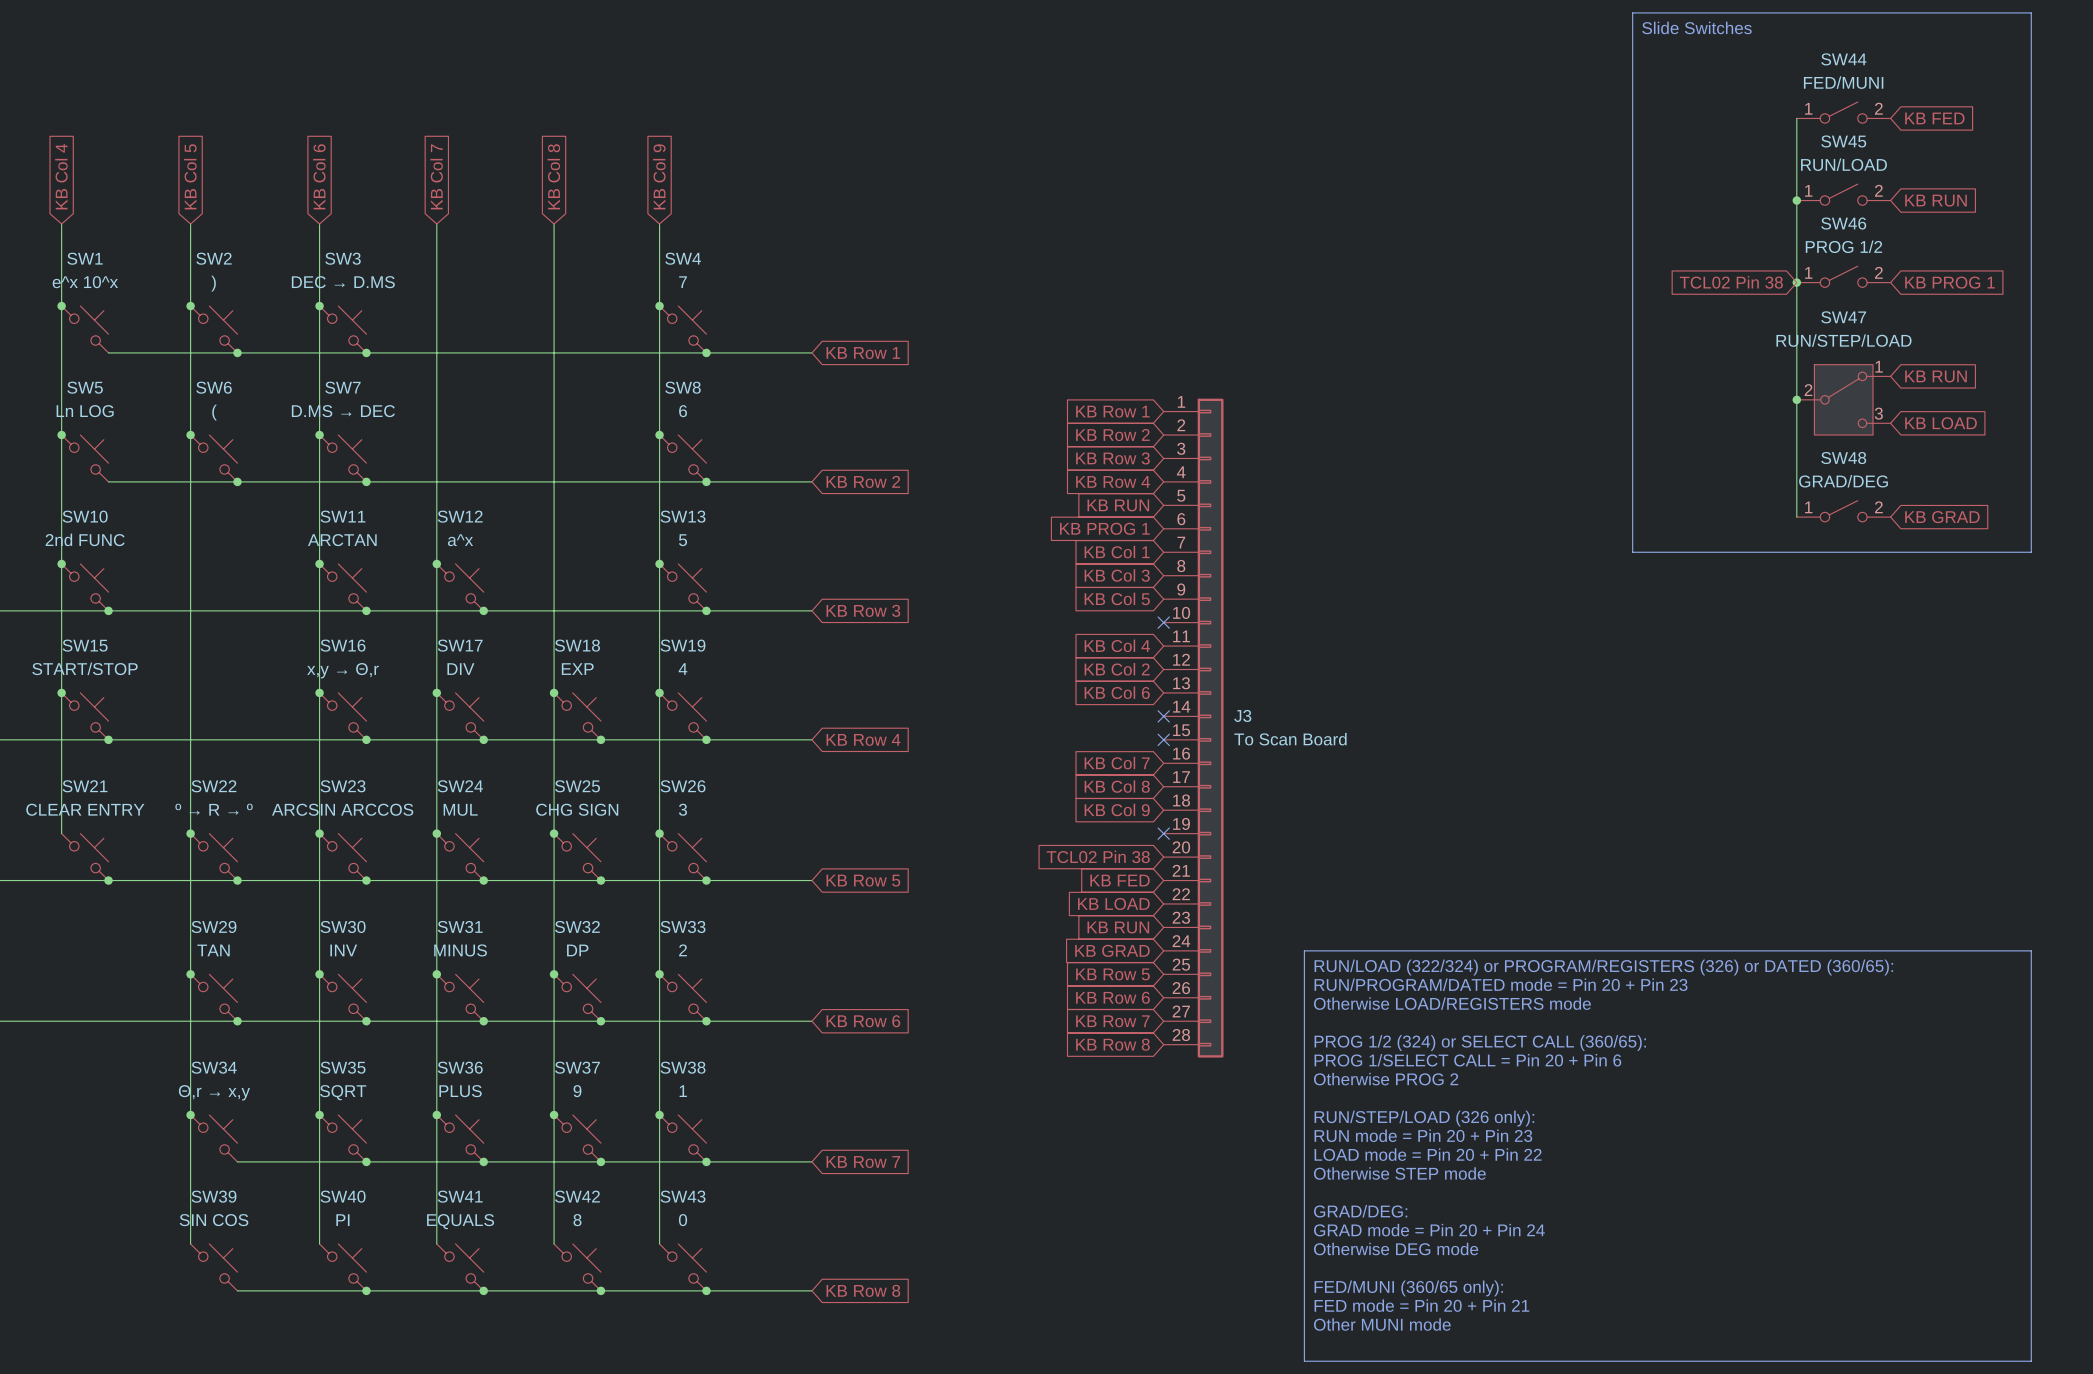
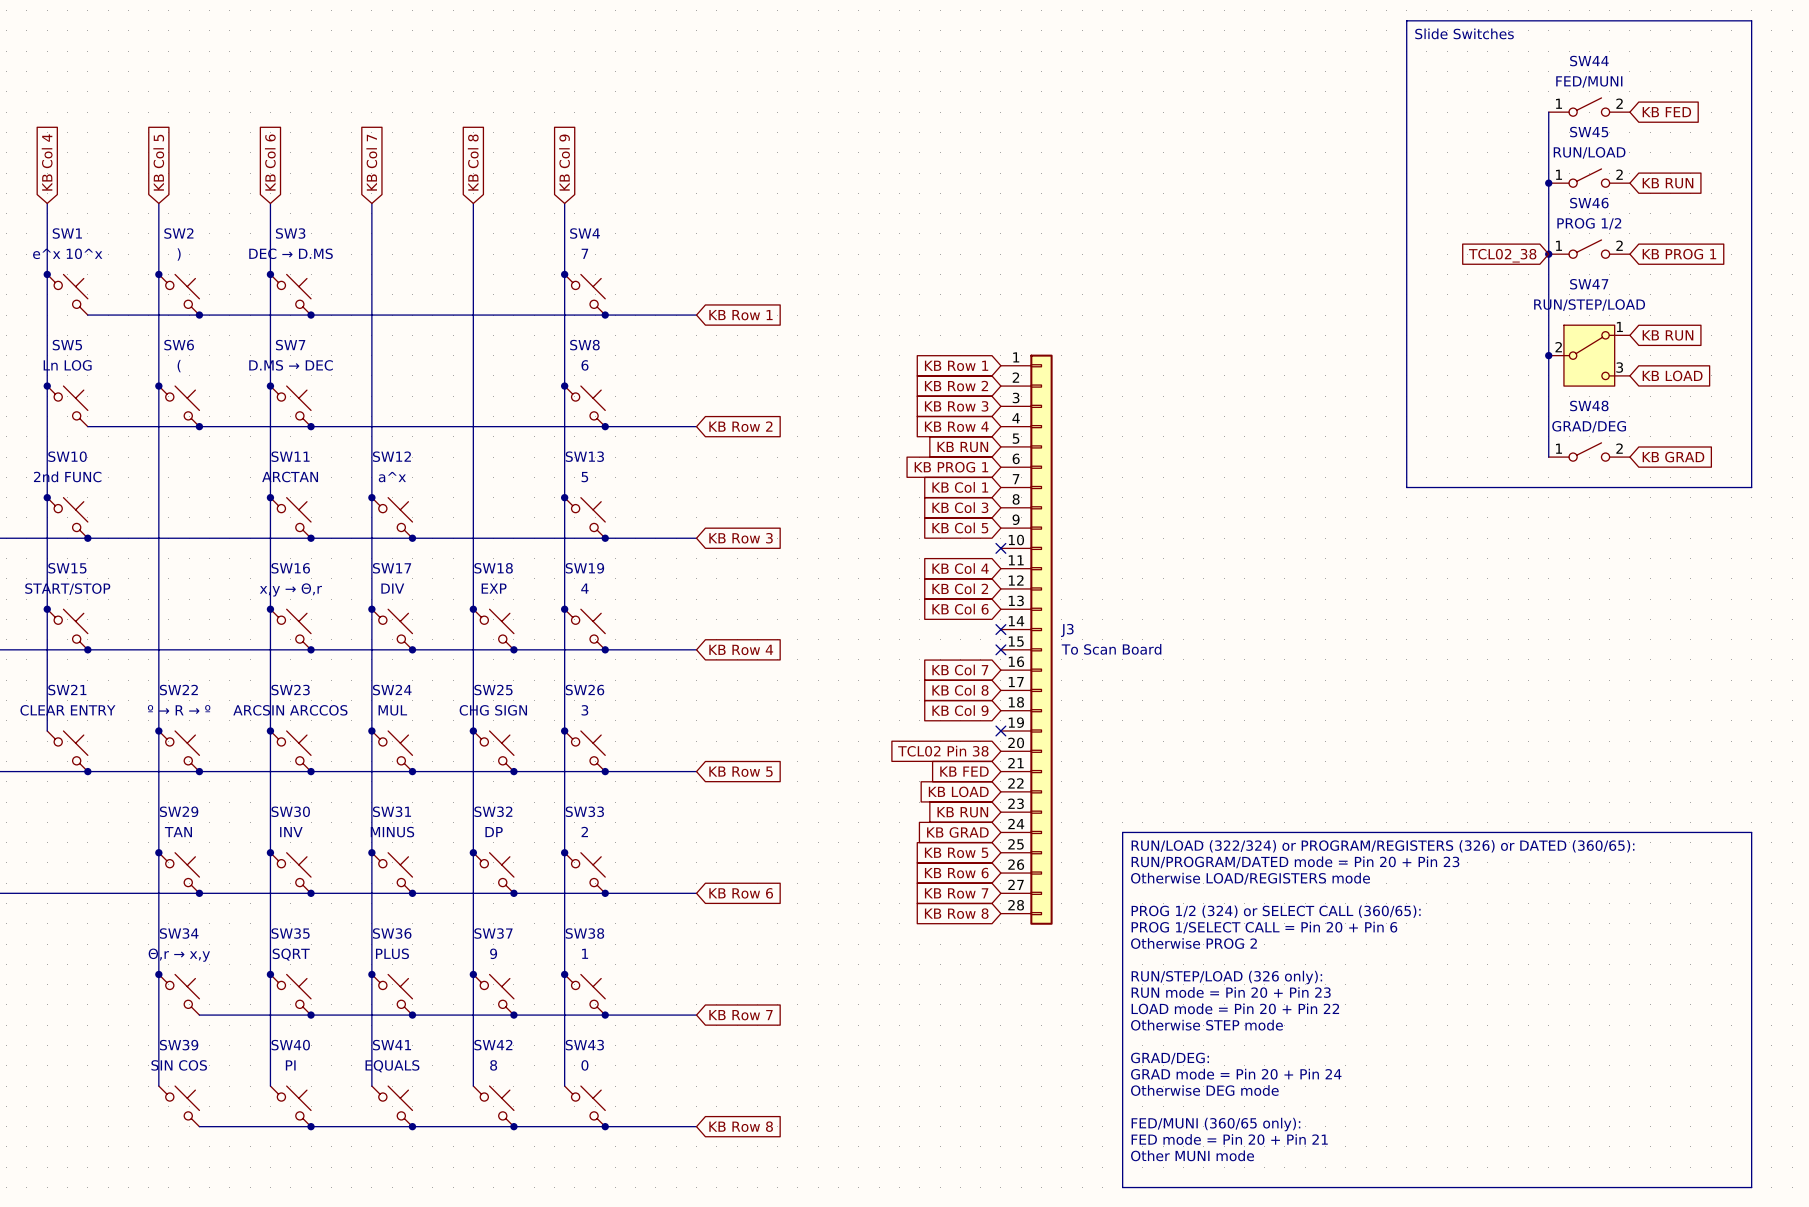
global label: TCL02 Pin 38 (1731, 282) -> TCL02_38 (1502, 255)

